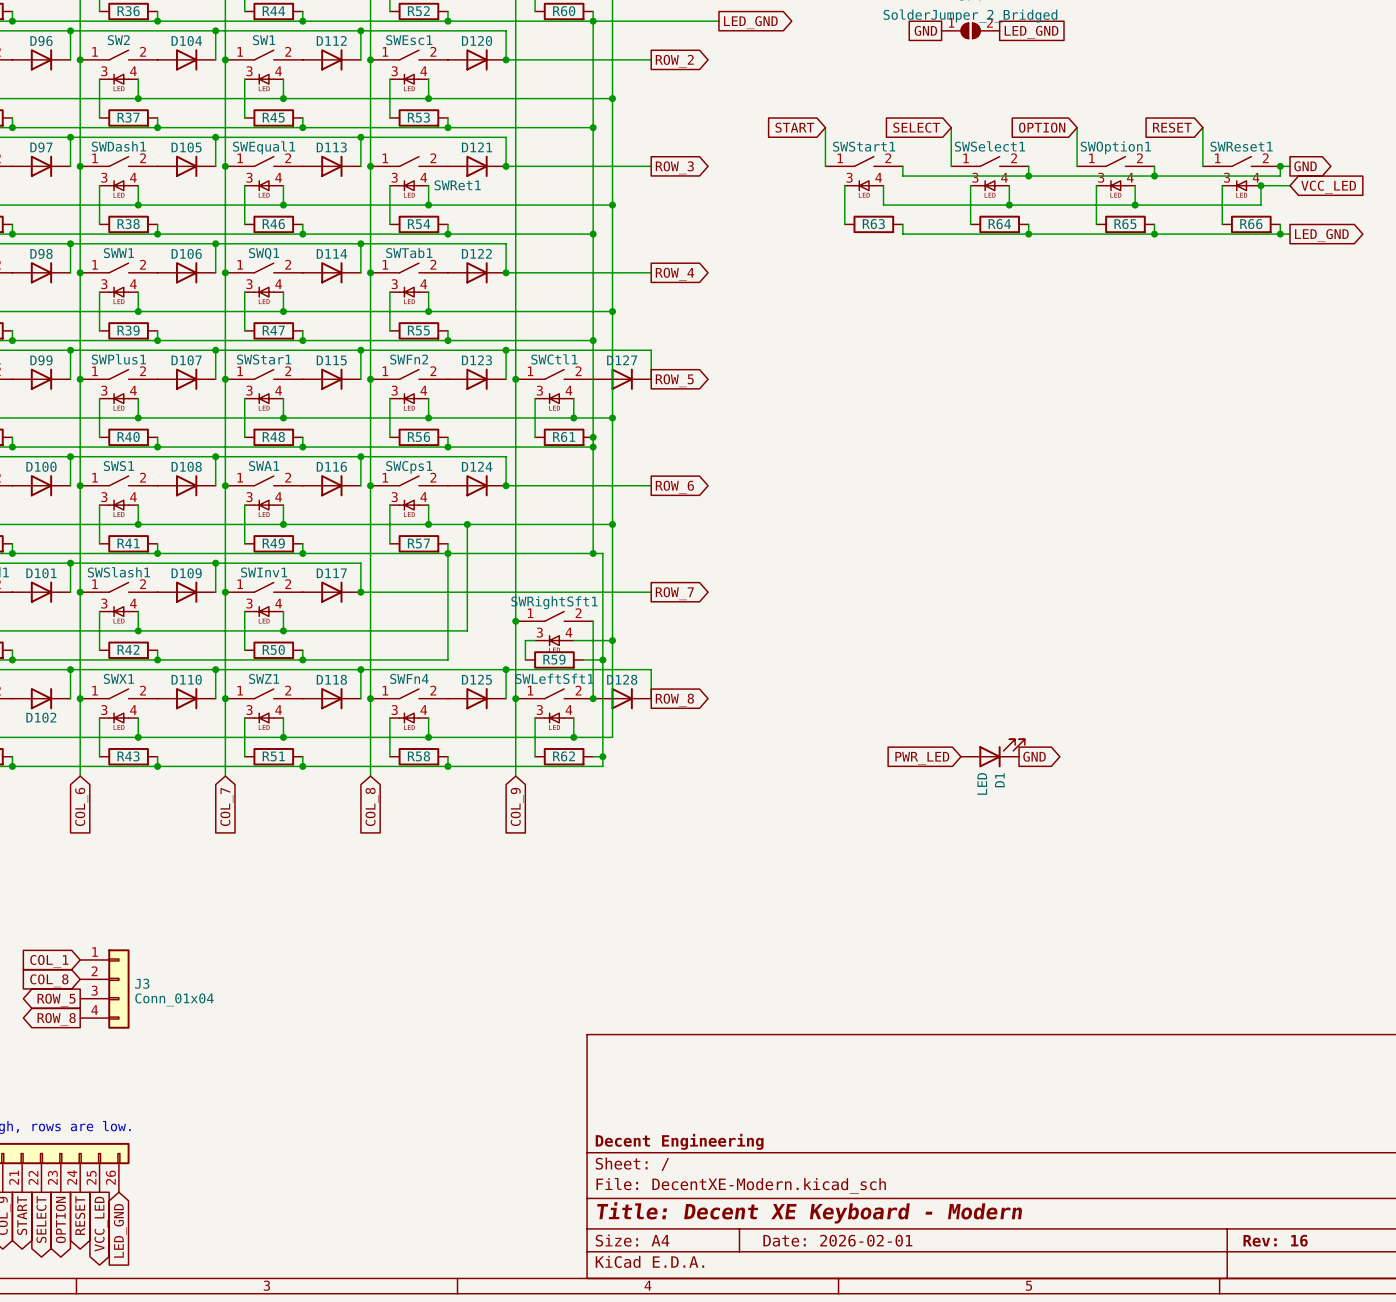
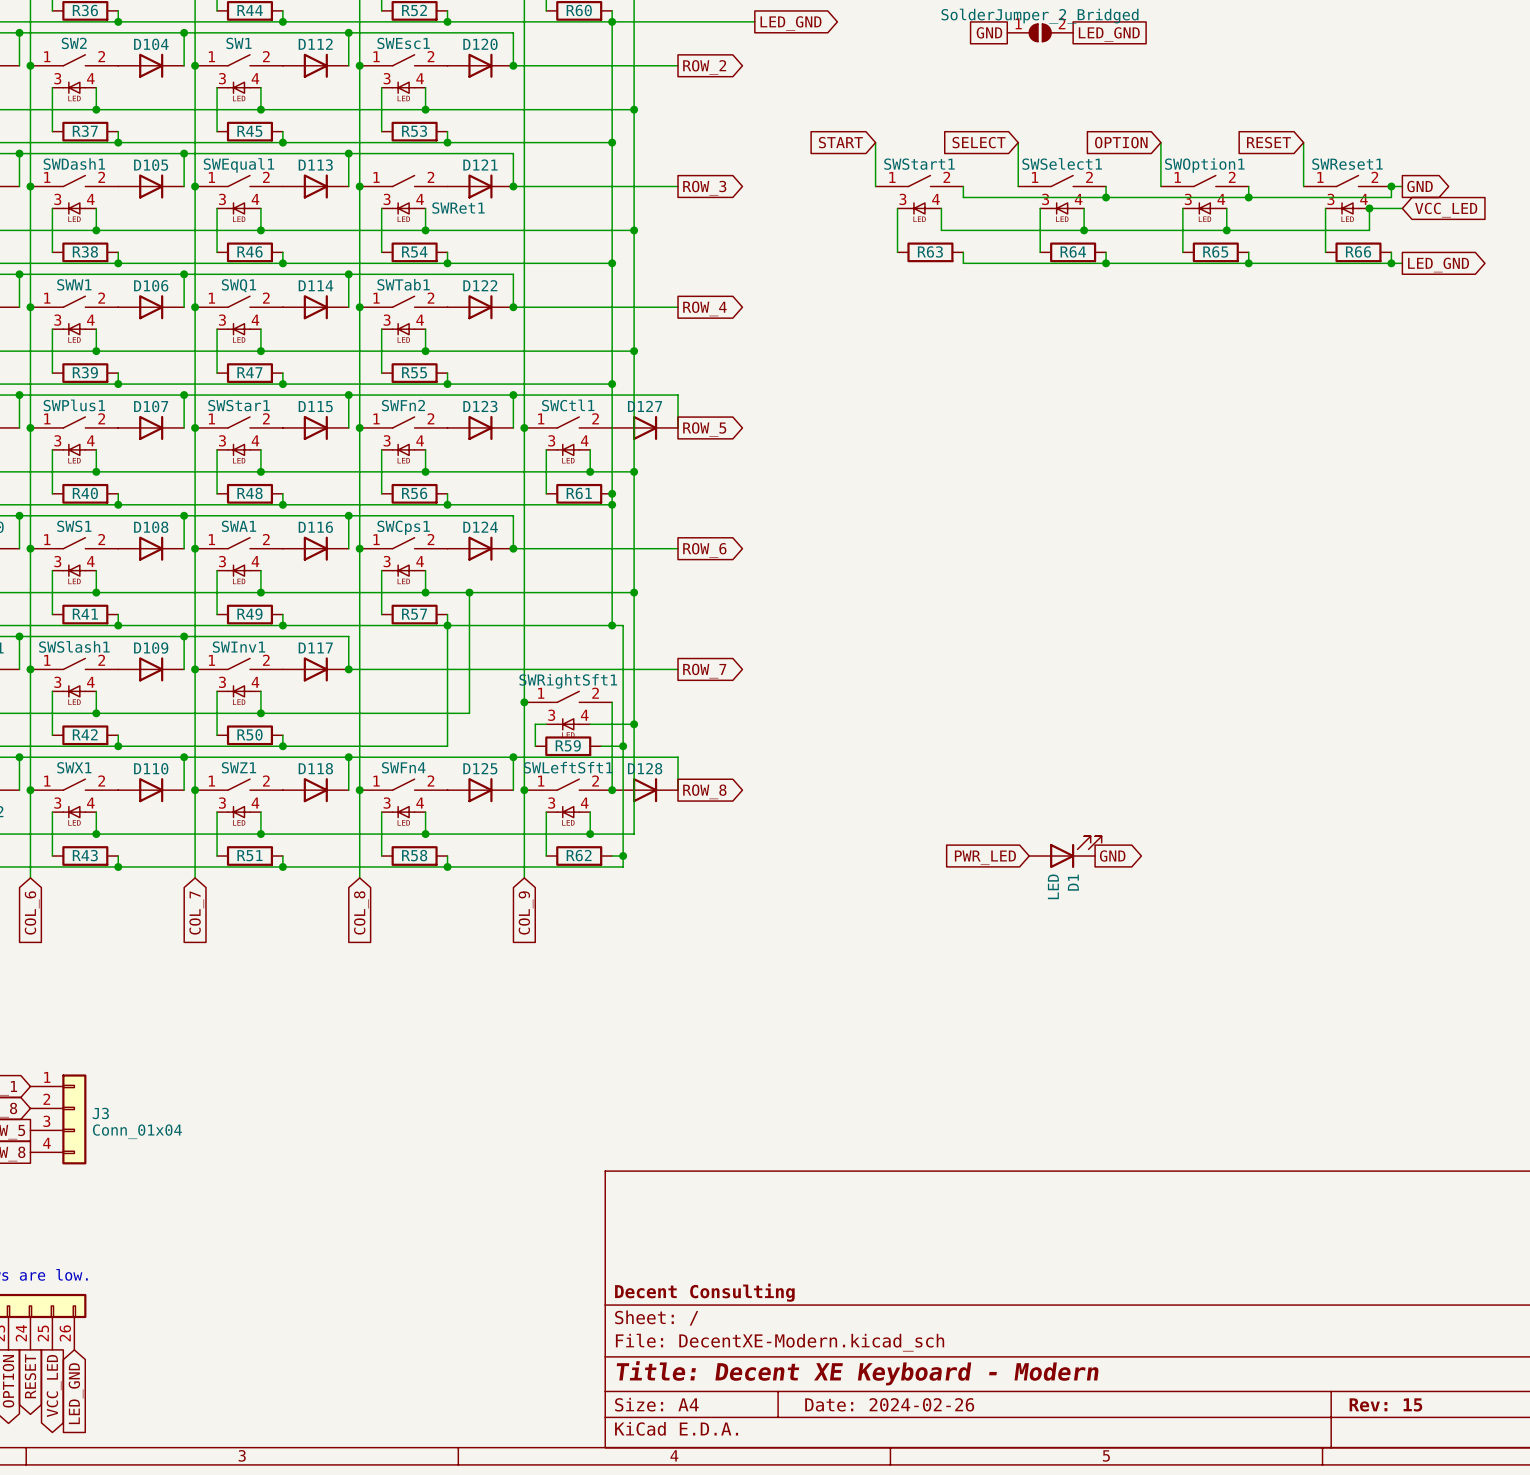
title block: Decent Engineering (679, 1141) -> Decent Consulting (704, 1292)
title block: Date: 2026-02-01 (837, 1240) -> Date: 2024-02-26 (889, 1404)
title block: Rev: 16 (1275, 1240) -> Rev: 15 (1385, 1404)

